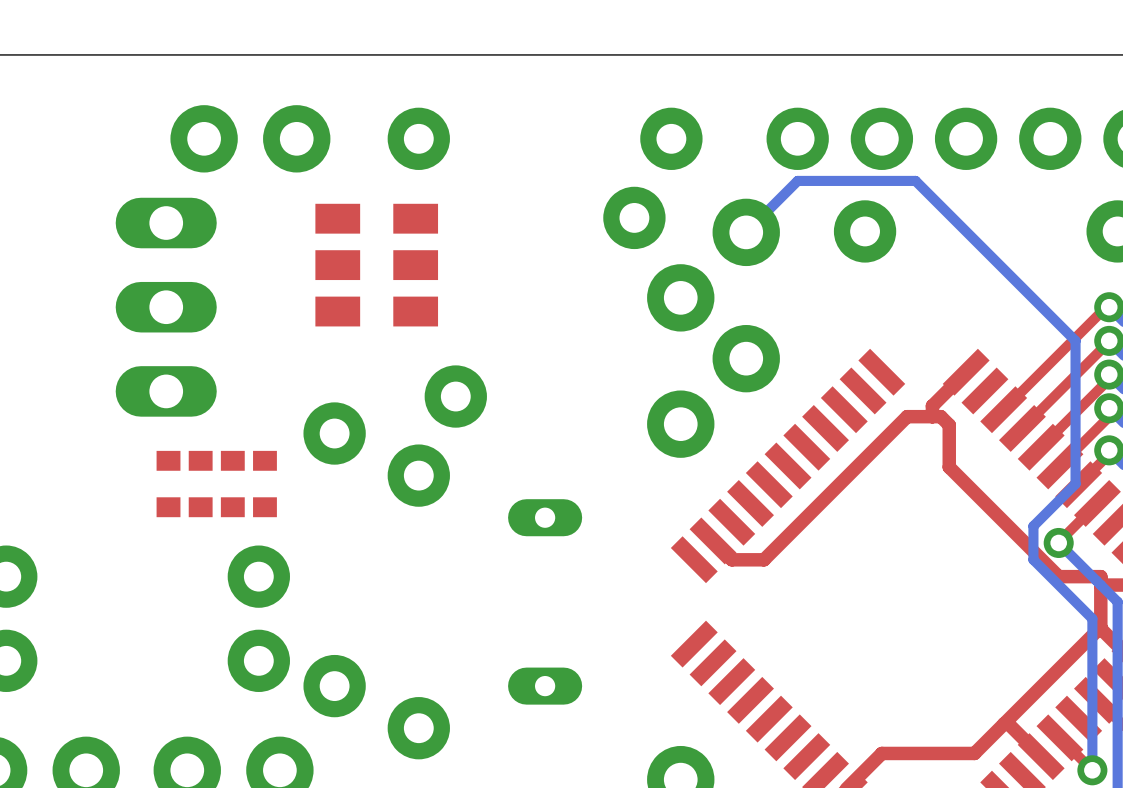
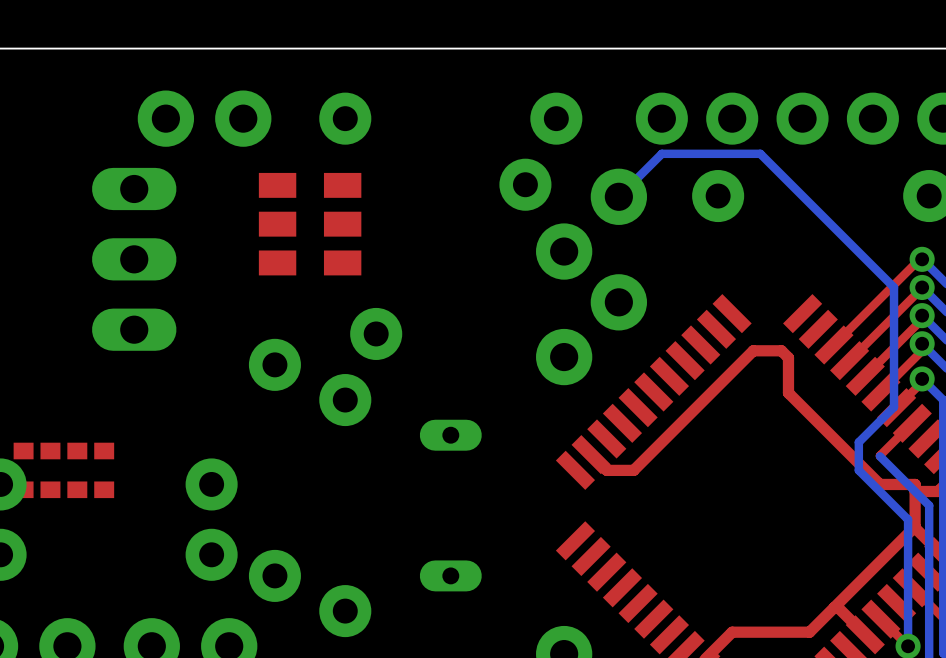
top track: (966, 372) (932, 405) (932, 416) -> none
part position: (216, 484) -> (63, 470)
via: (1058, 542) -> none

